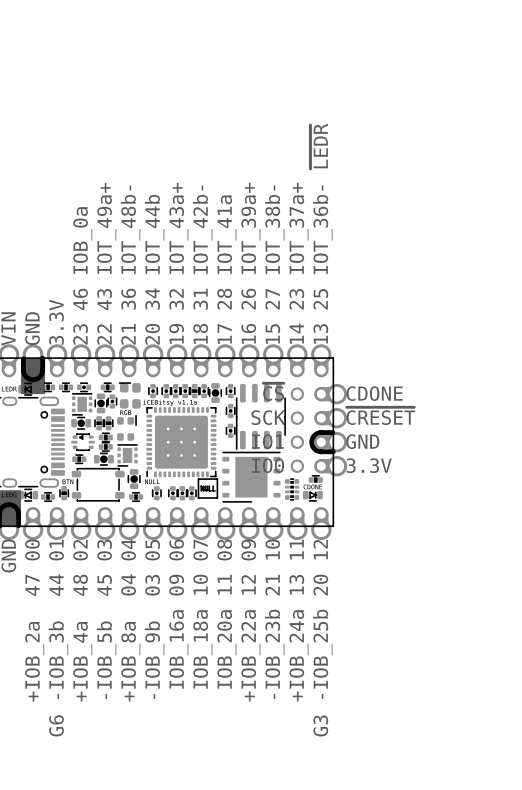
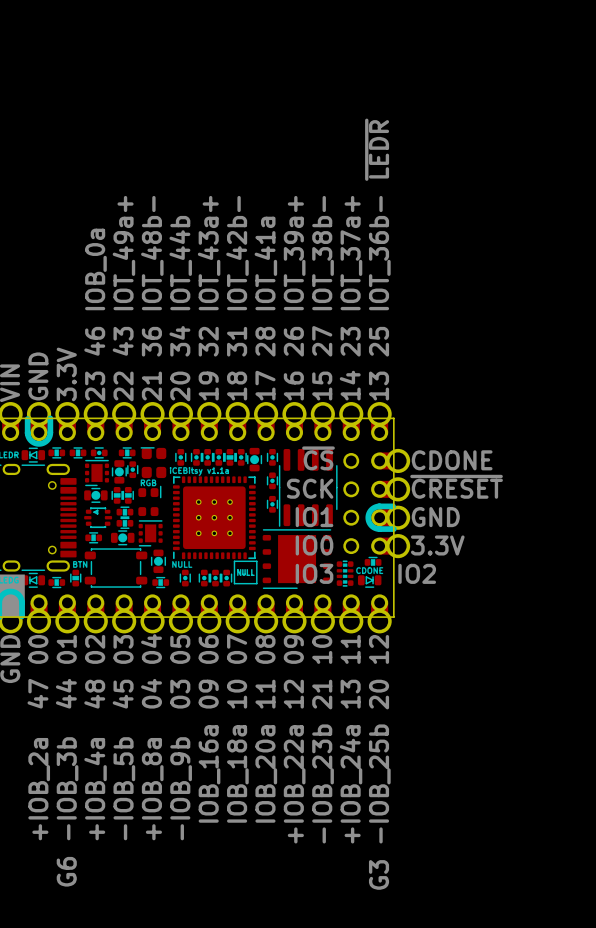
drawing: [21, 358, 46, 395] -> none
text: none -> IO3 (314, 573)
text: none -> IO2 (417, 573)

